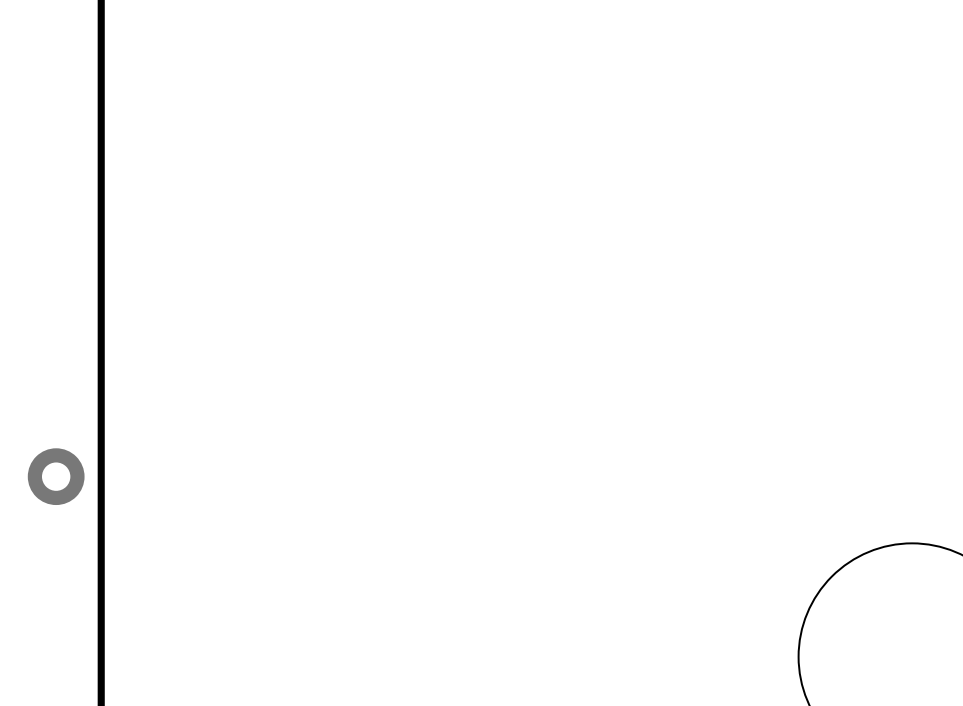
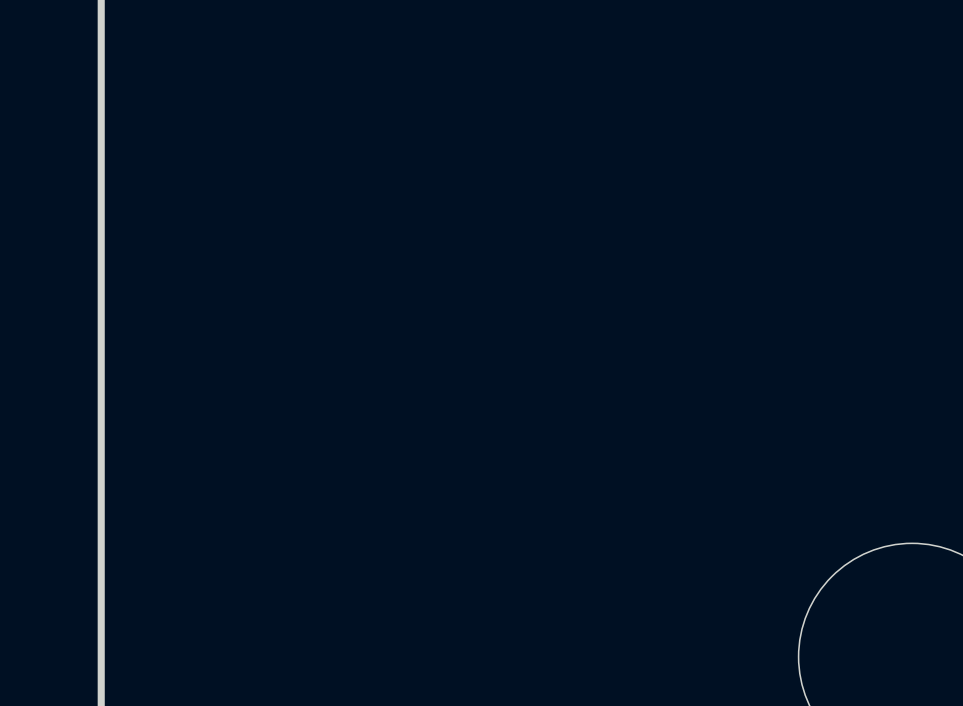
via: (56, 476) -> none

